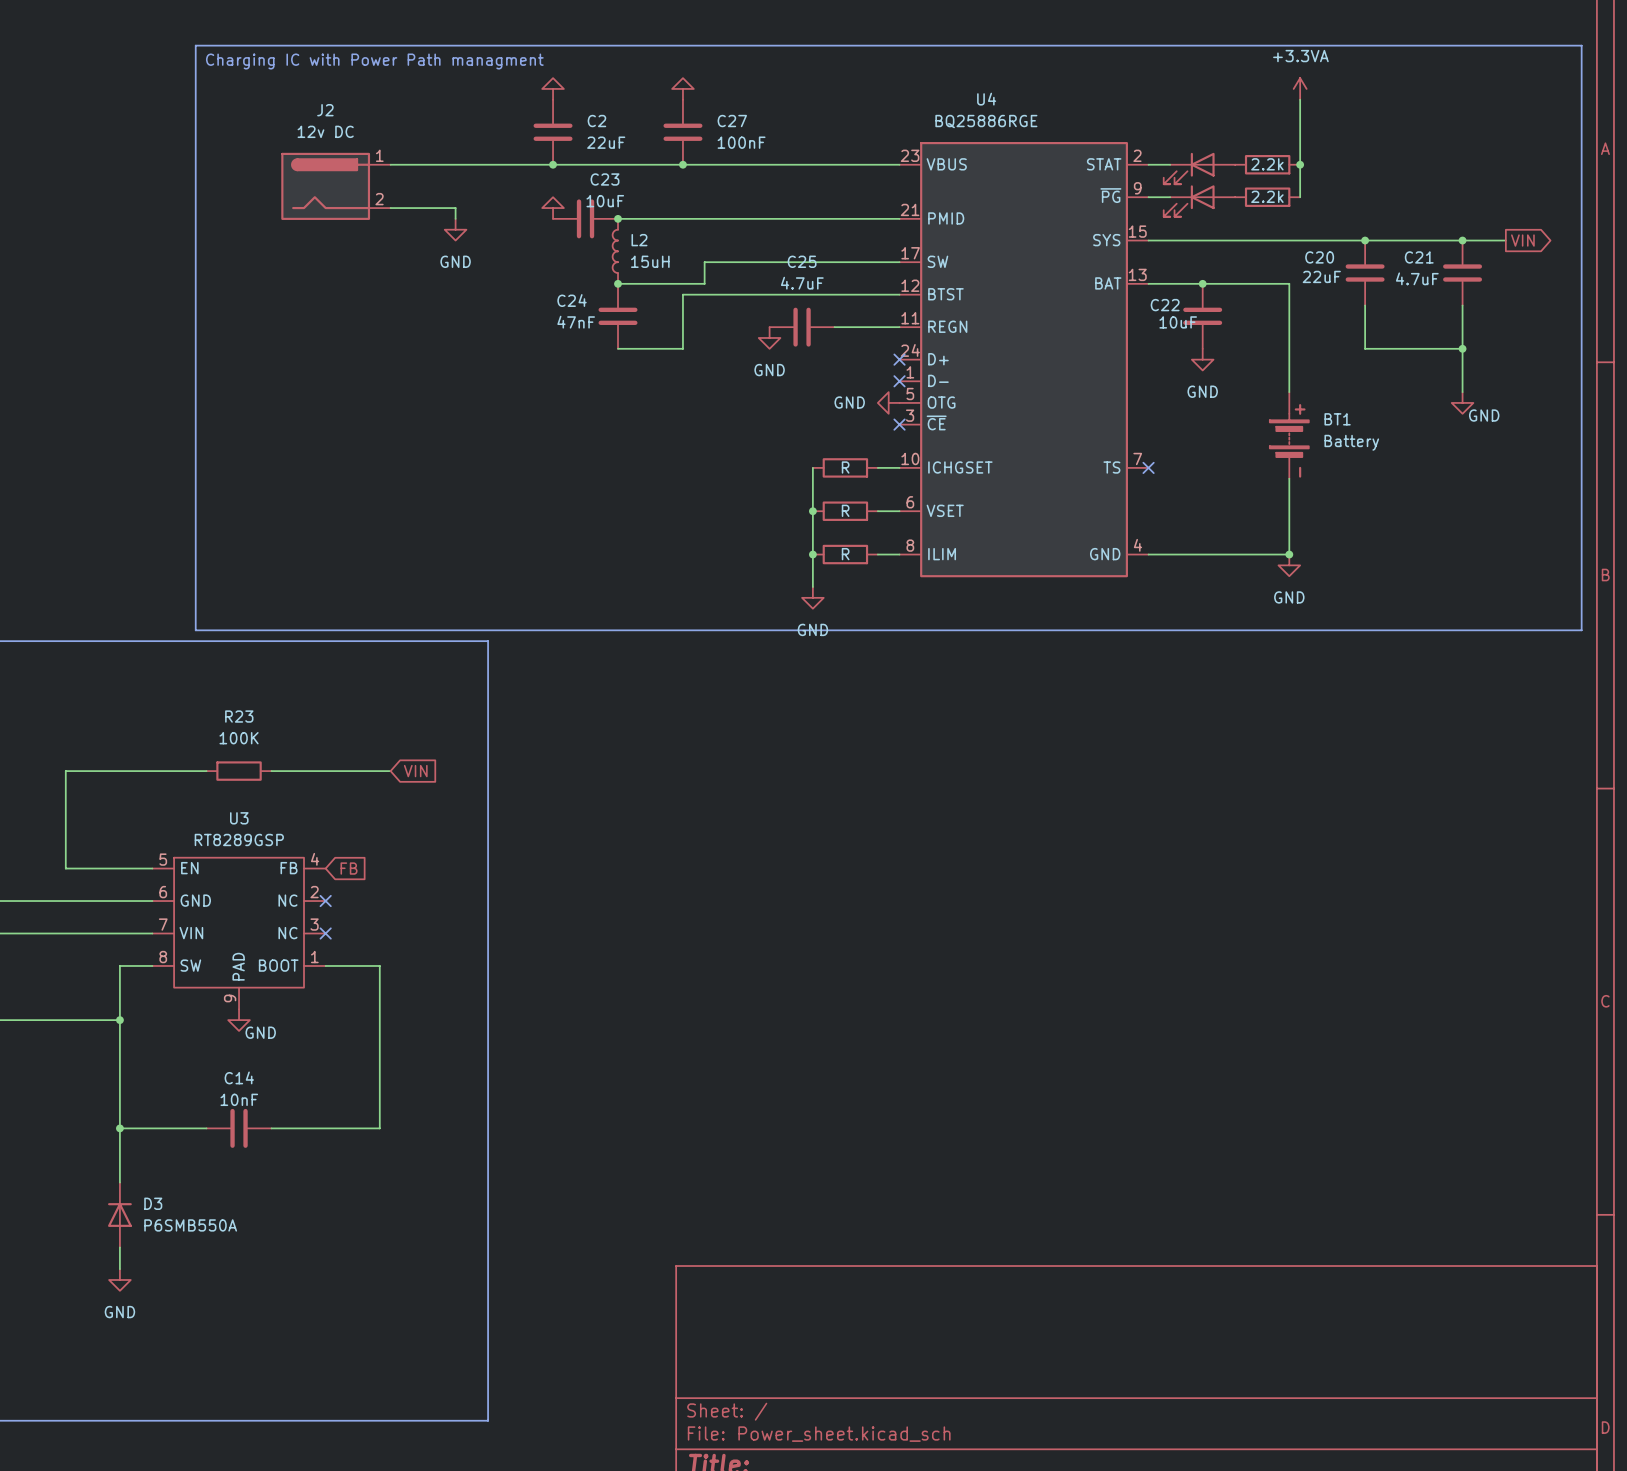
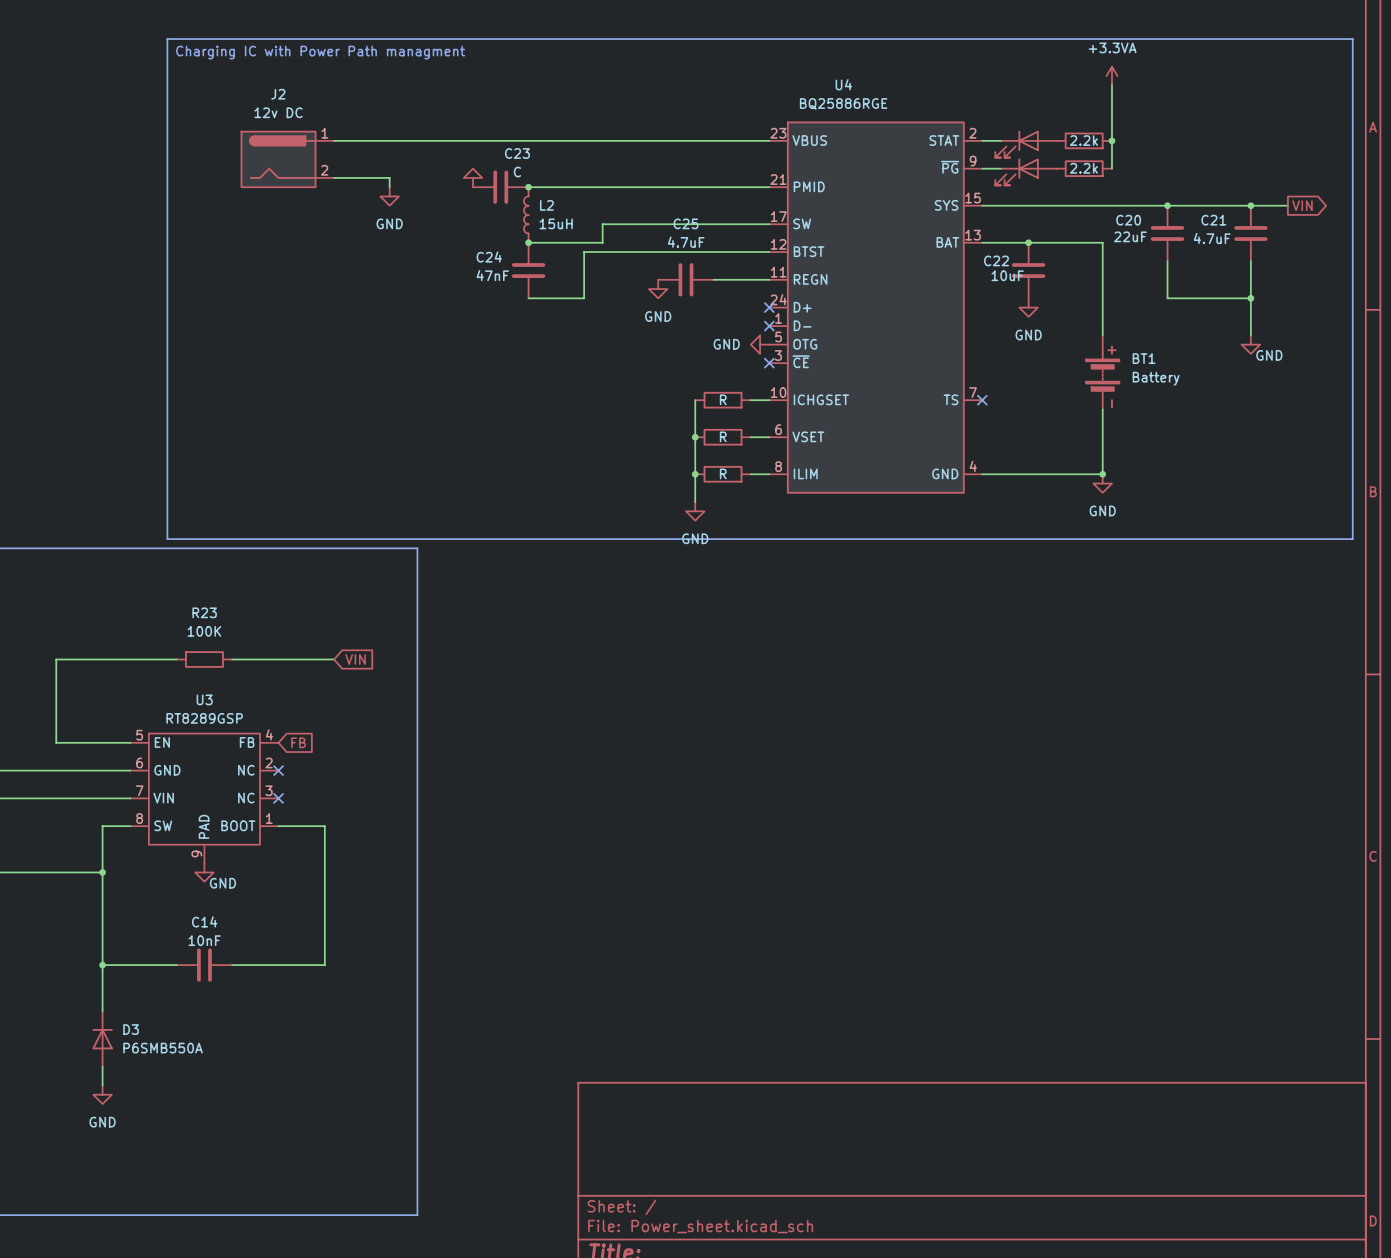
power symbol: (553, 88) -> none
power symbol: (682, 88) -> none
C2: 22uF (553, 132) -> none
C27: 100nF (682, 132) -> none
junction: (553, 164) -> none
junction: (682, 164) -> none
C23 value: 10uF (605, 201) -> C (517, 172)

